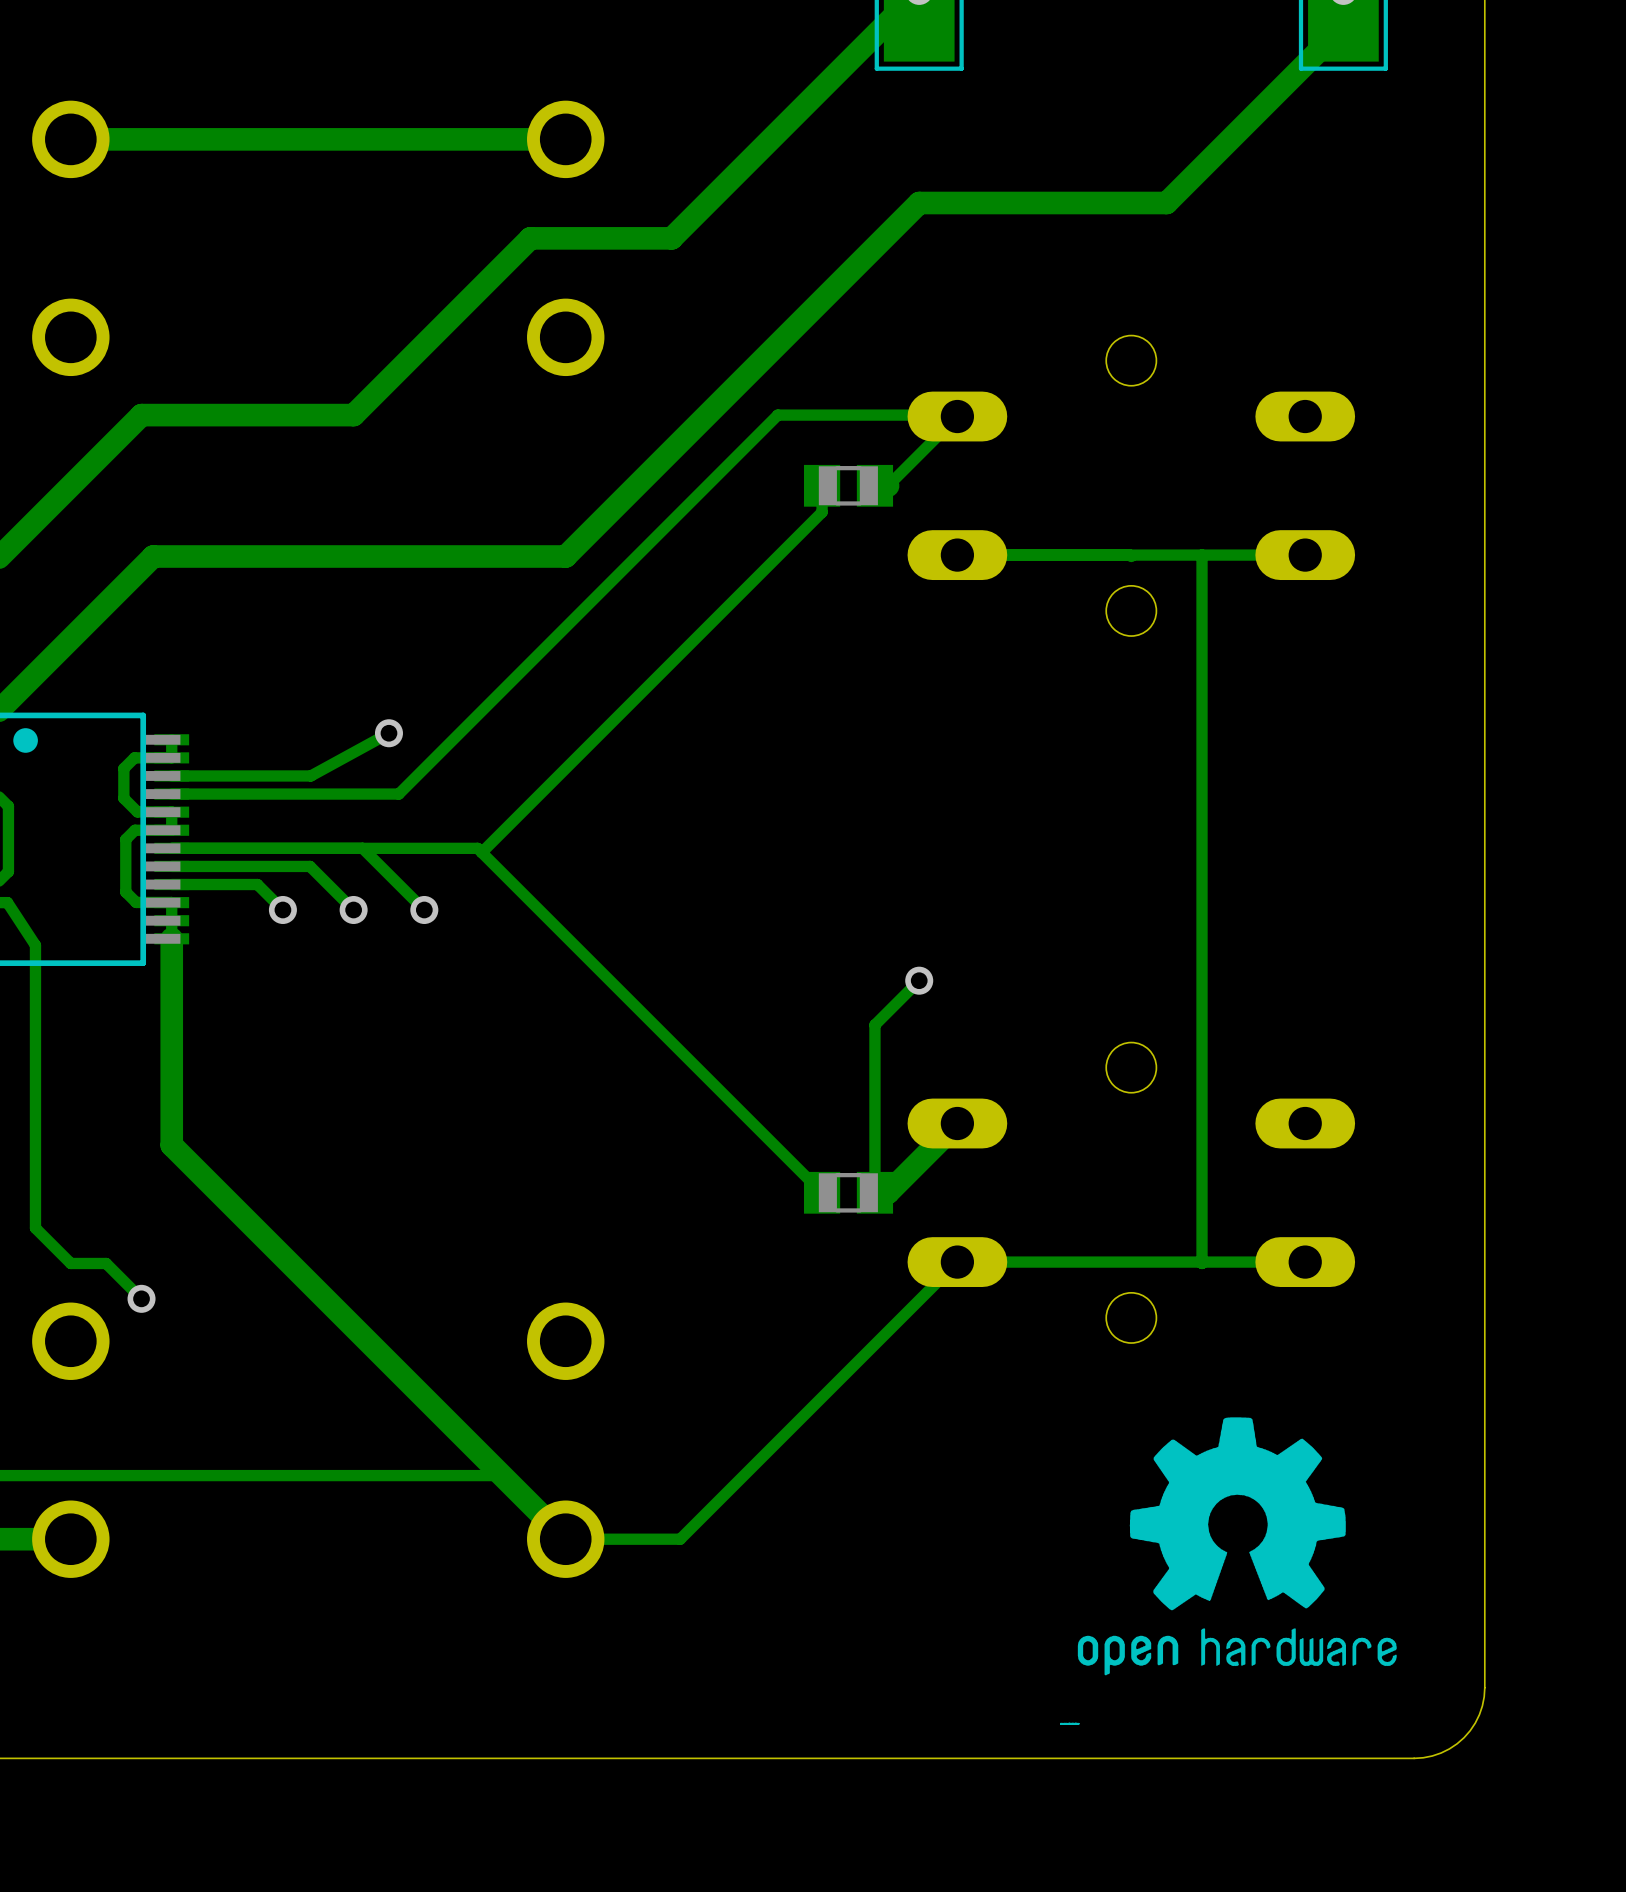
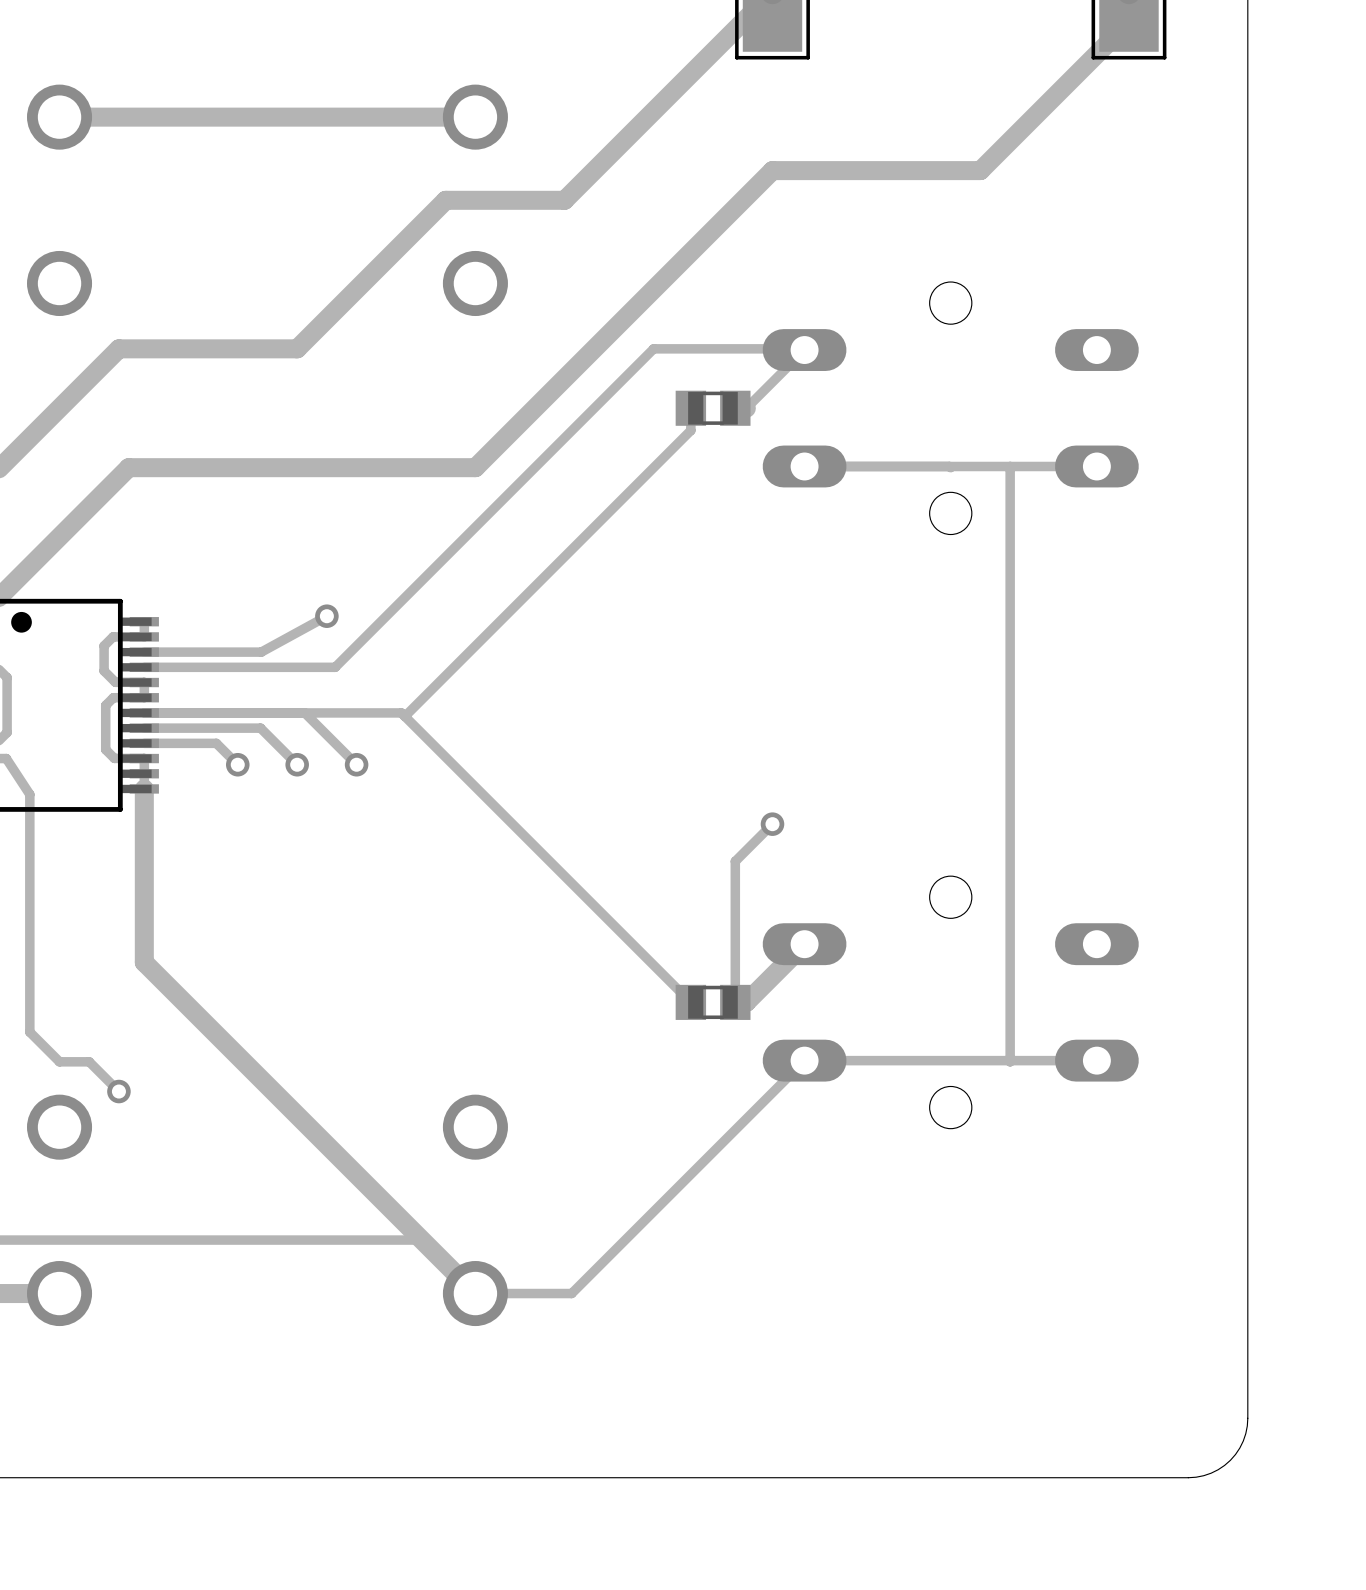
drawing: [1077, 1417, 1397, 1676] -> none

